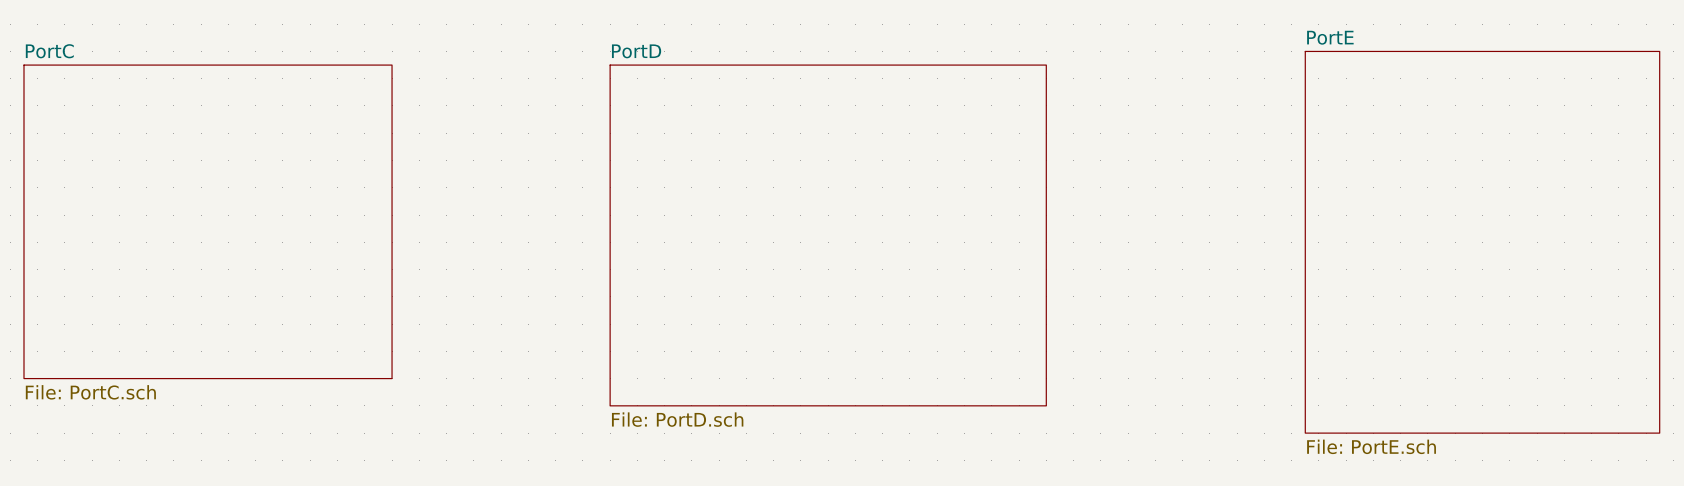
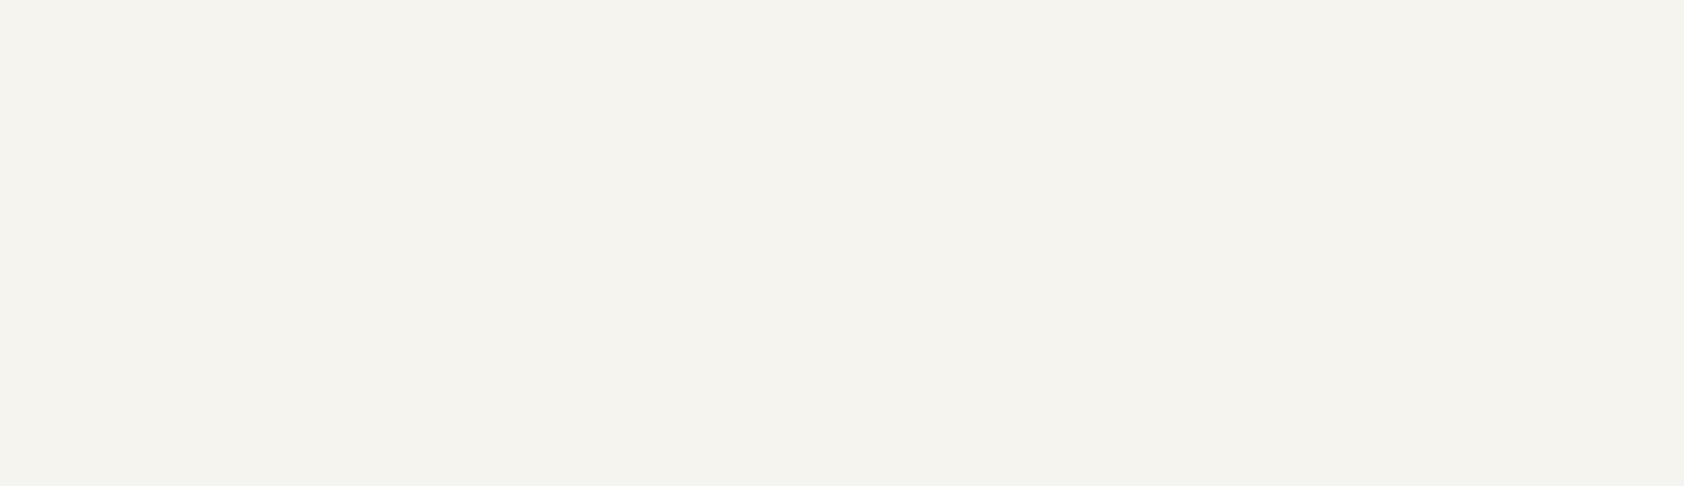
sheet PortC: File: PortC.sch (208, 221) -> none
sheet PortD: File: PortD.sch (828, 235) -> none
sheet PortE: File: PortE.sch (1482, 242) -> none

